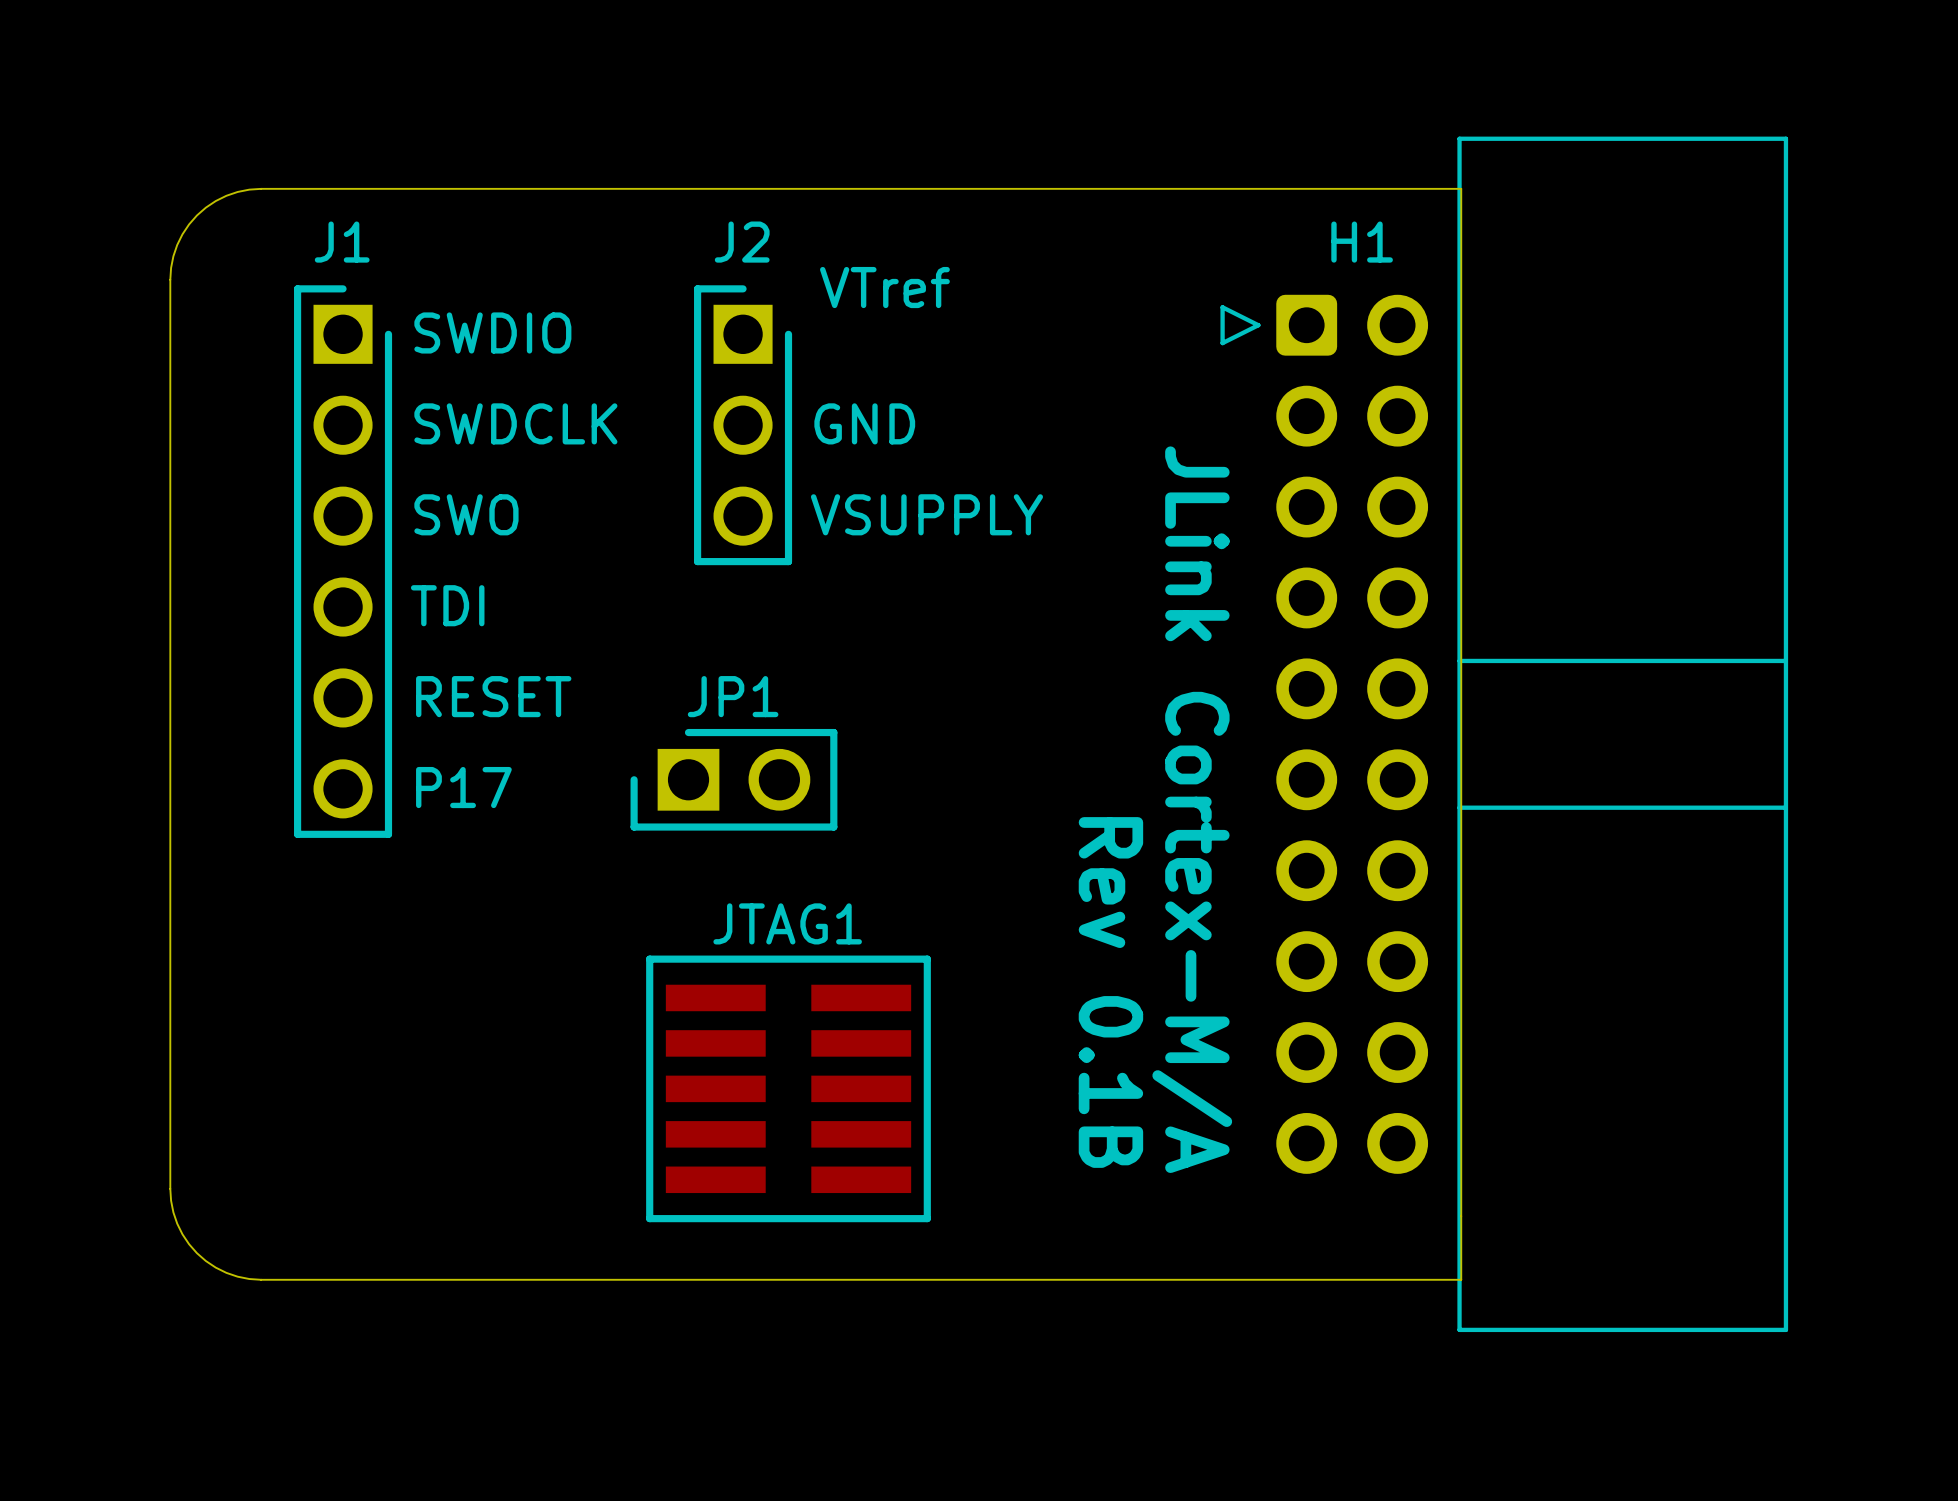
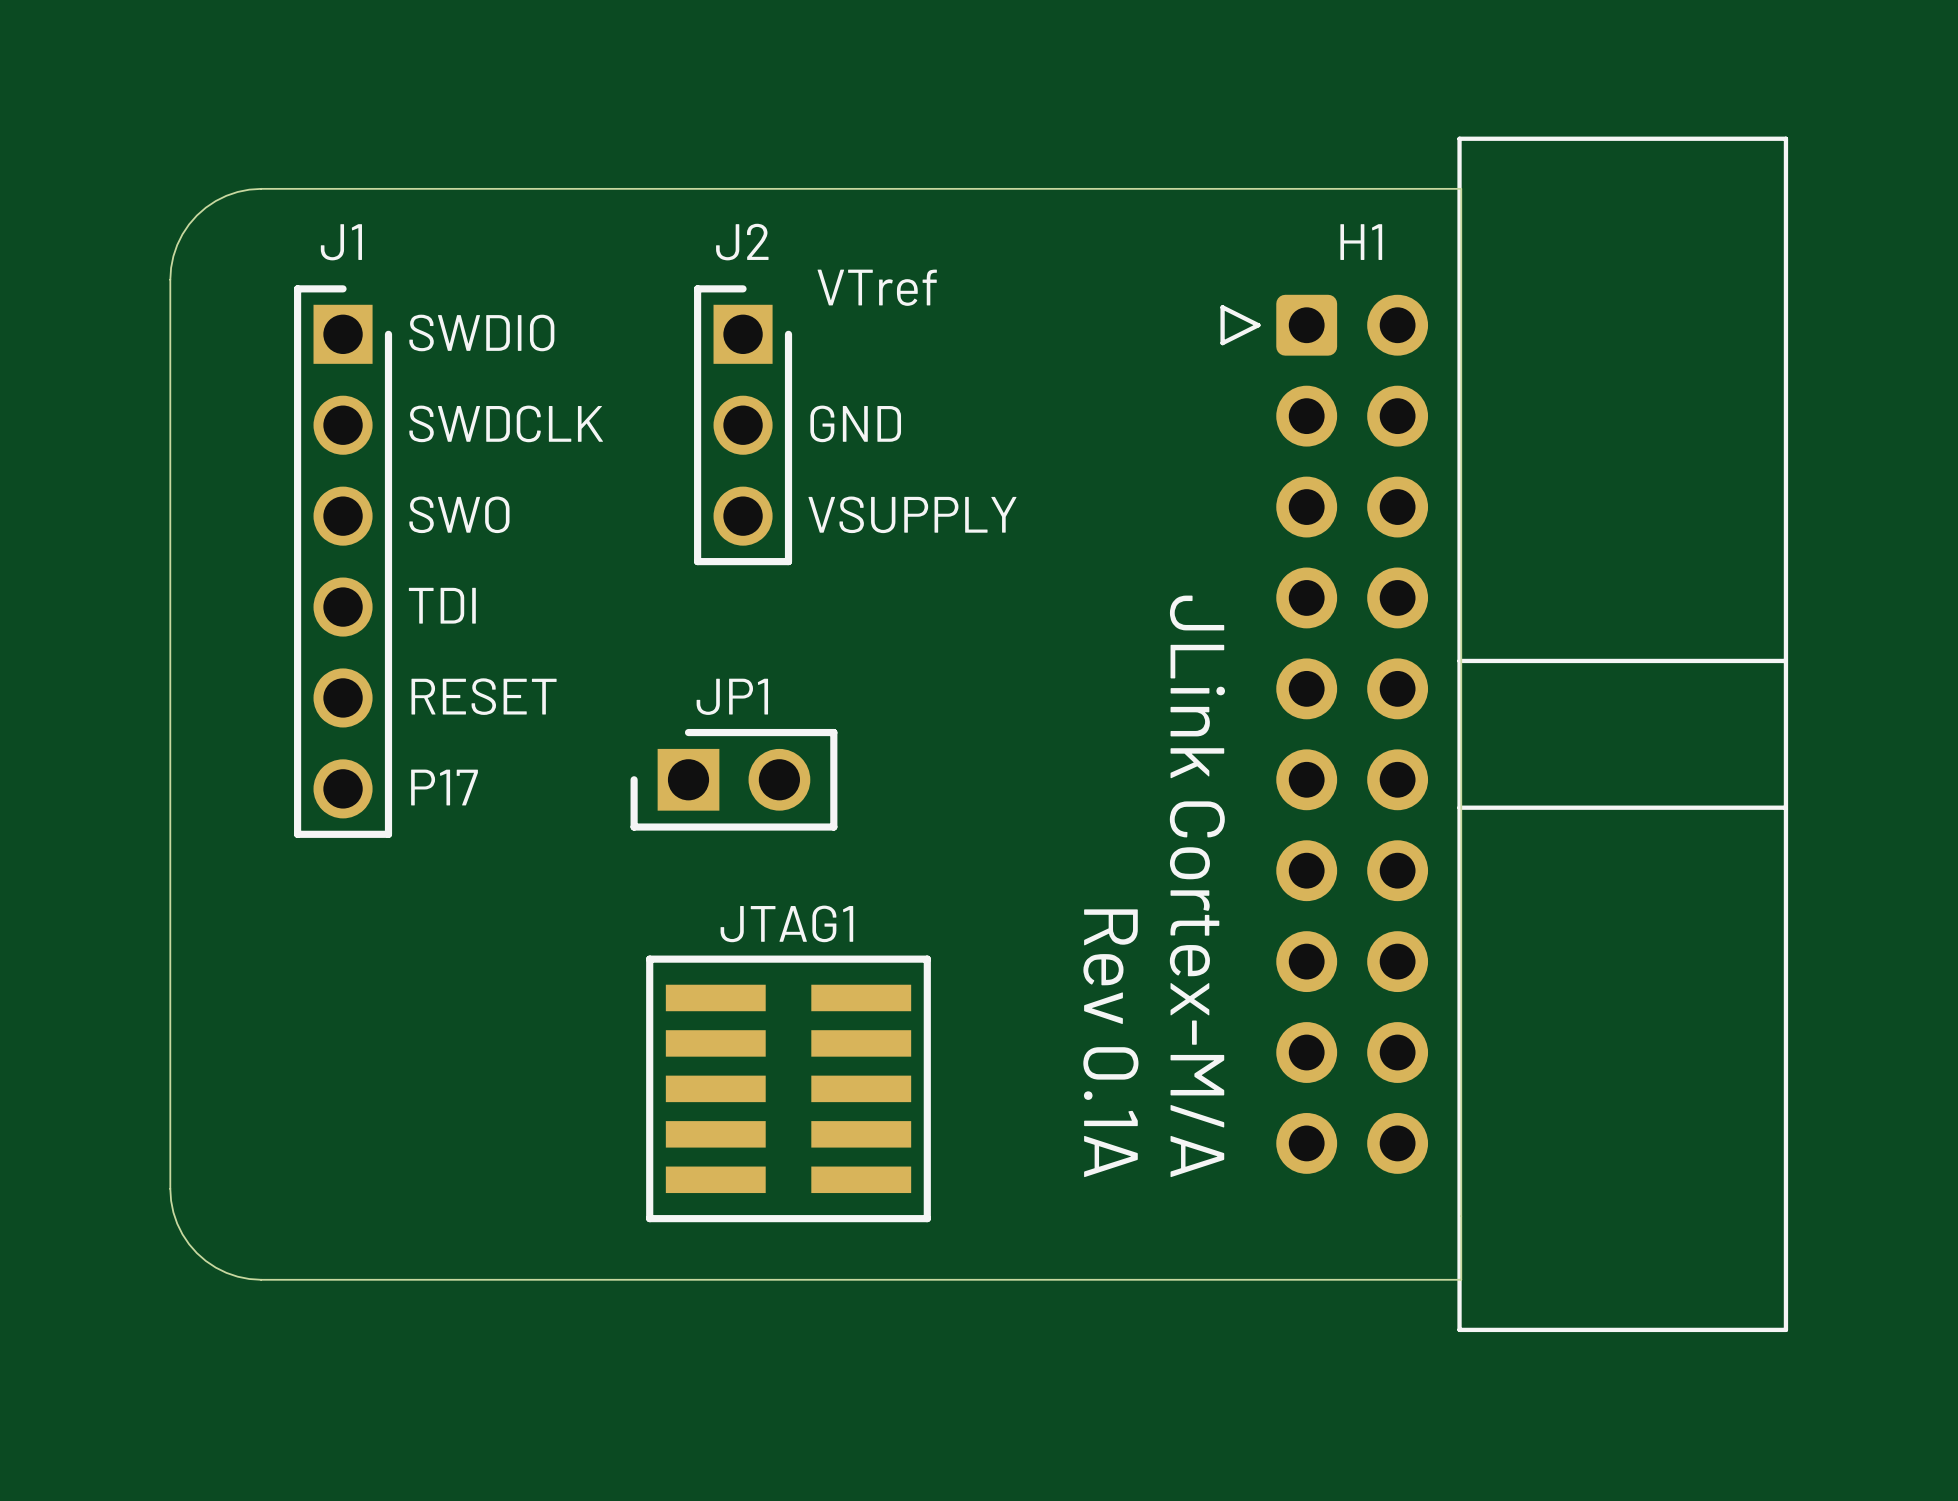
text: Rev 0.1B (1110, 992) -> Rev 0.1A (1110, 1043)

